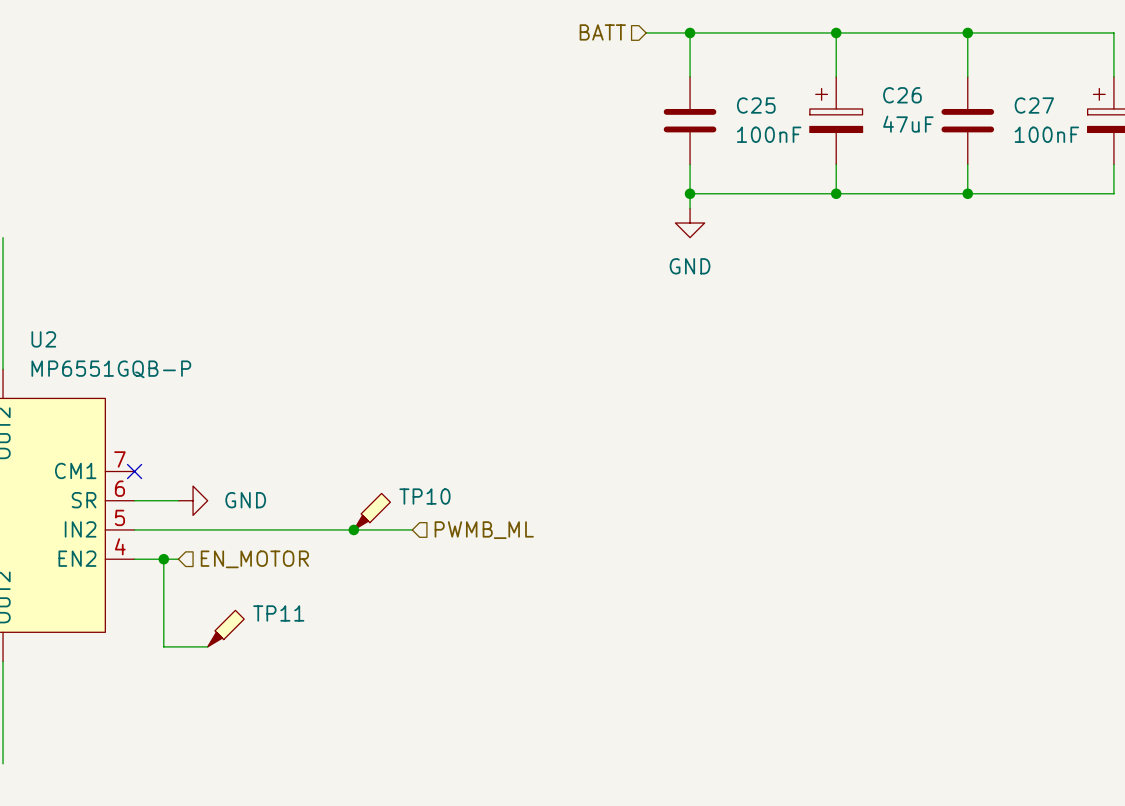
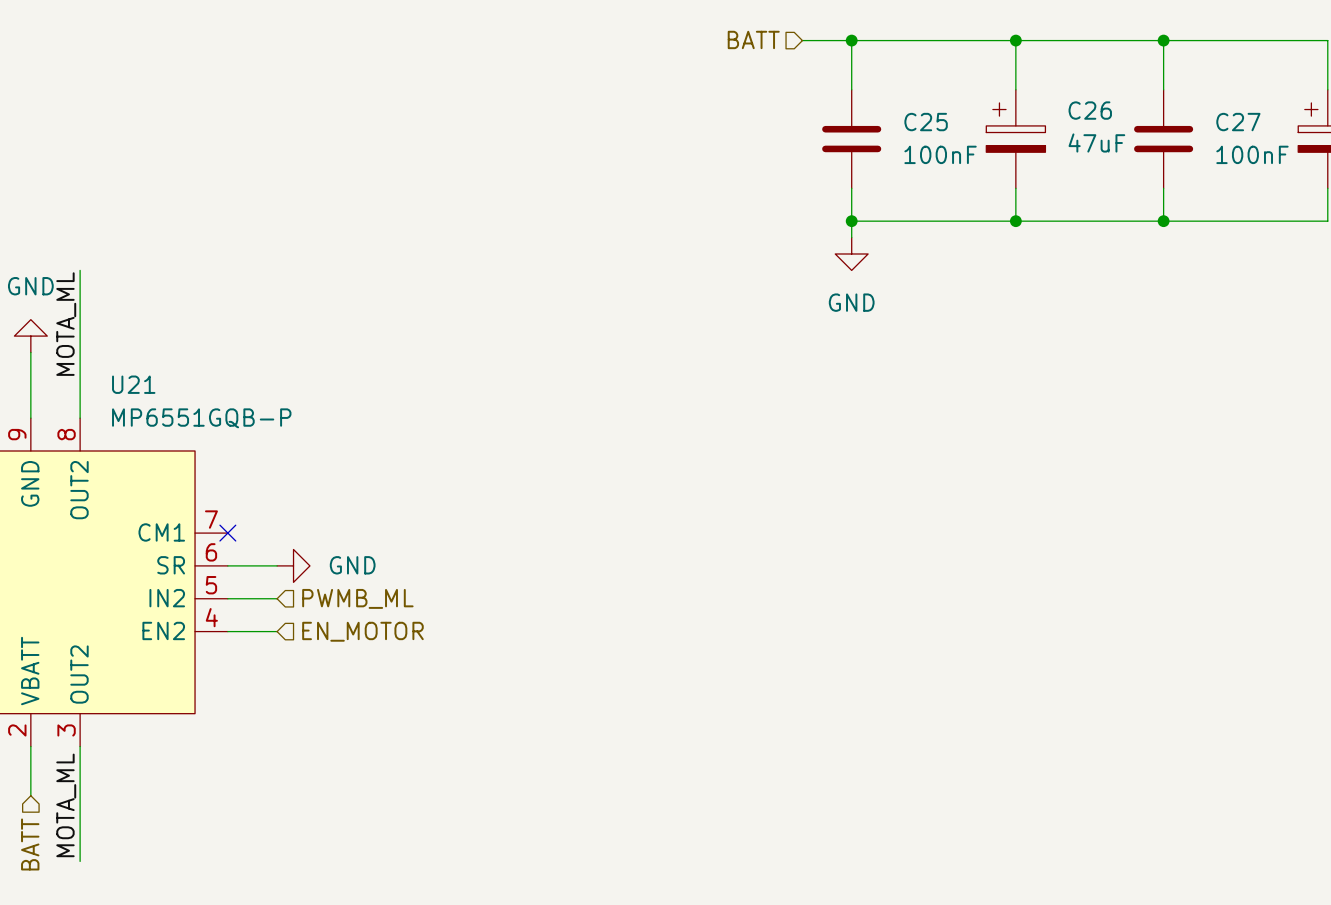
U2 name: U2 (43, 339) -> U21 (133, 384)
TP10: (372, 511) -> none
wire: (178, 529) (412, 529) -> none
junction: (353, 529) -> none
hierarchical label position: PWMB_ML (484, 530) -> PWMB_ML (357, 598)
wire: (163, 559) (163, 646) (207, 646) -> none
junction: (163, 559) -> none
TP11: (225, 628) -> none

